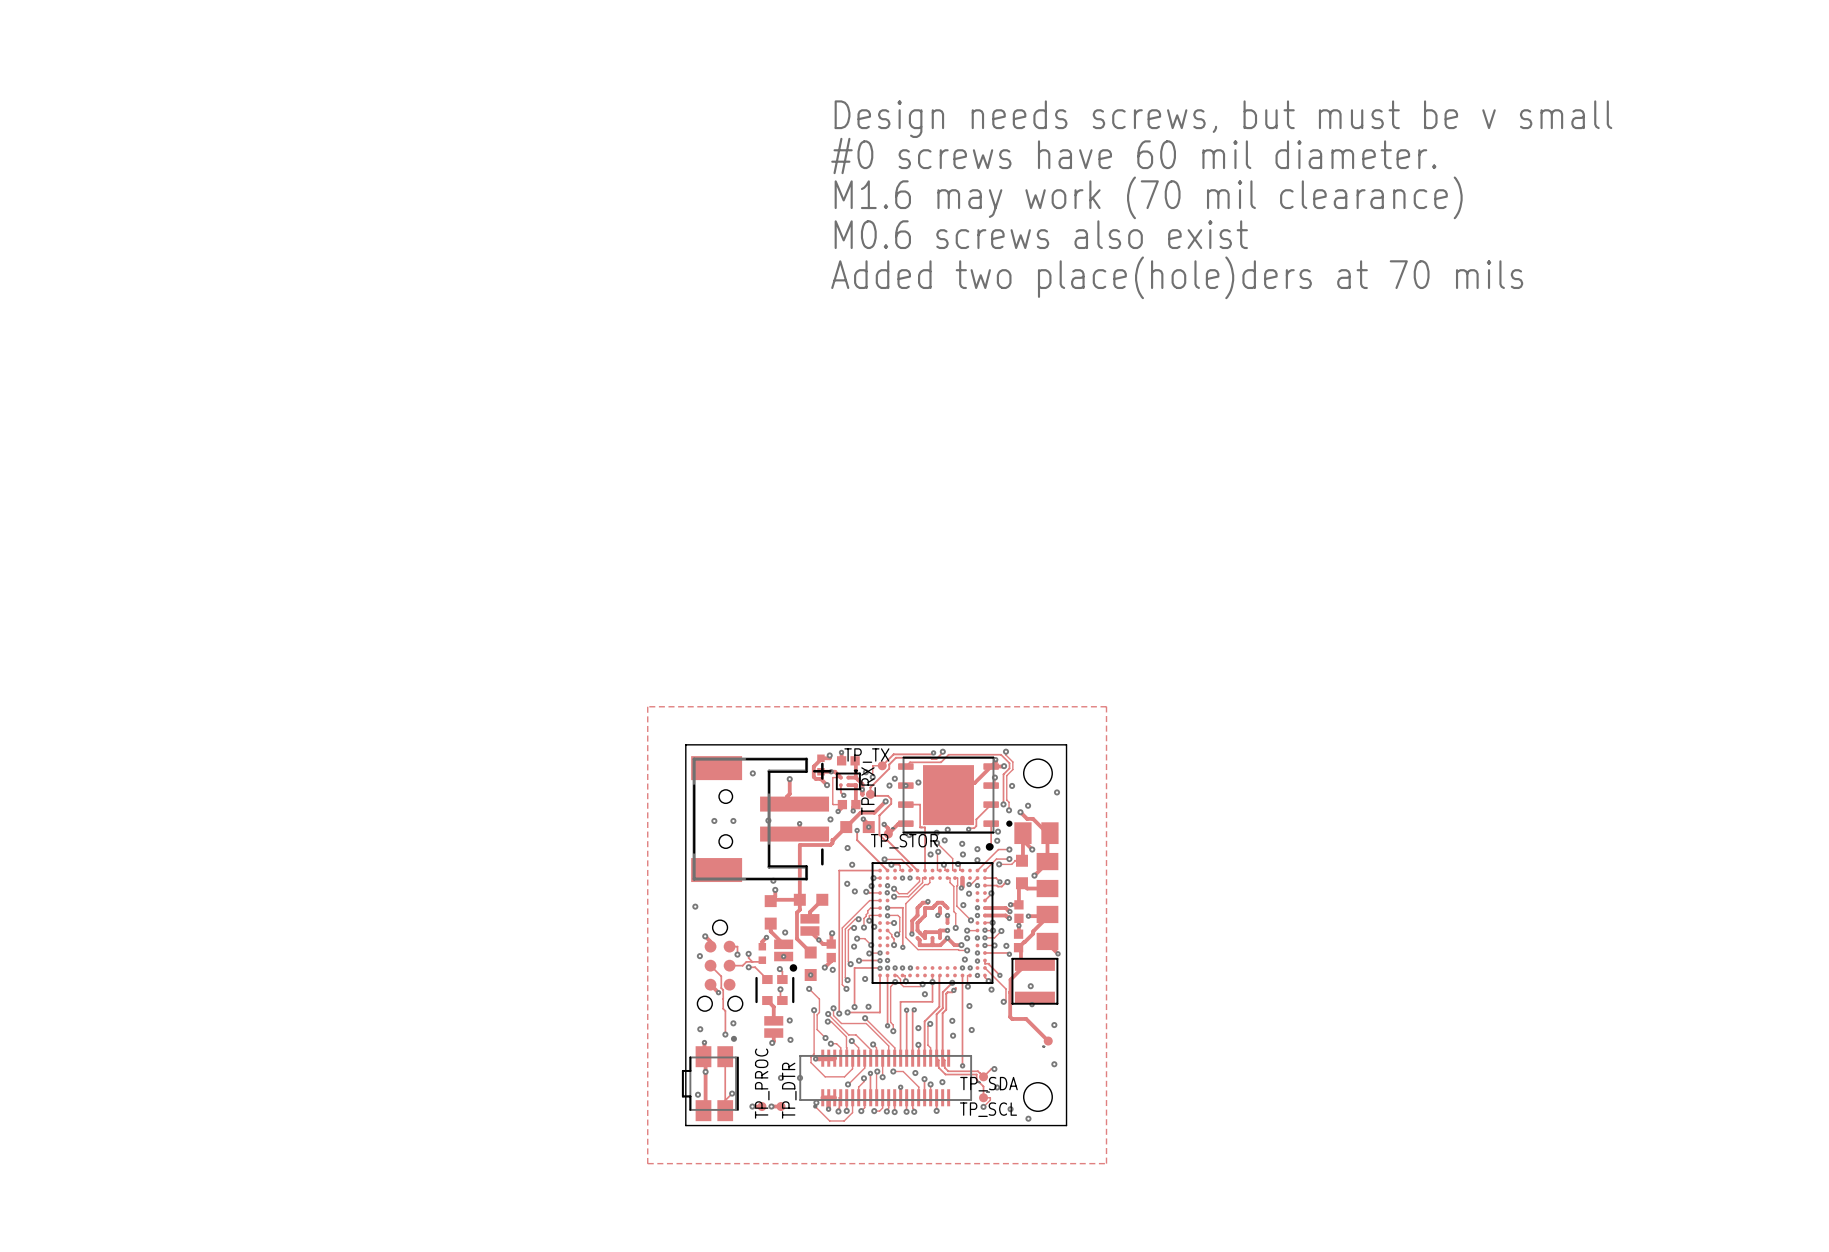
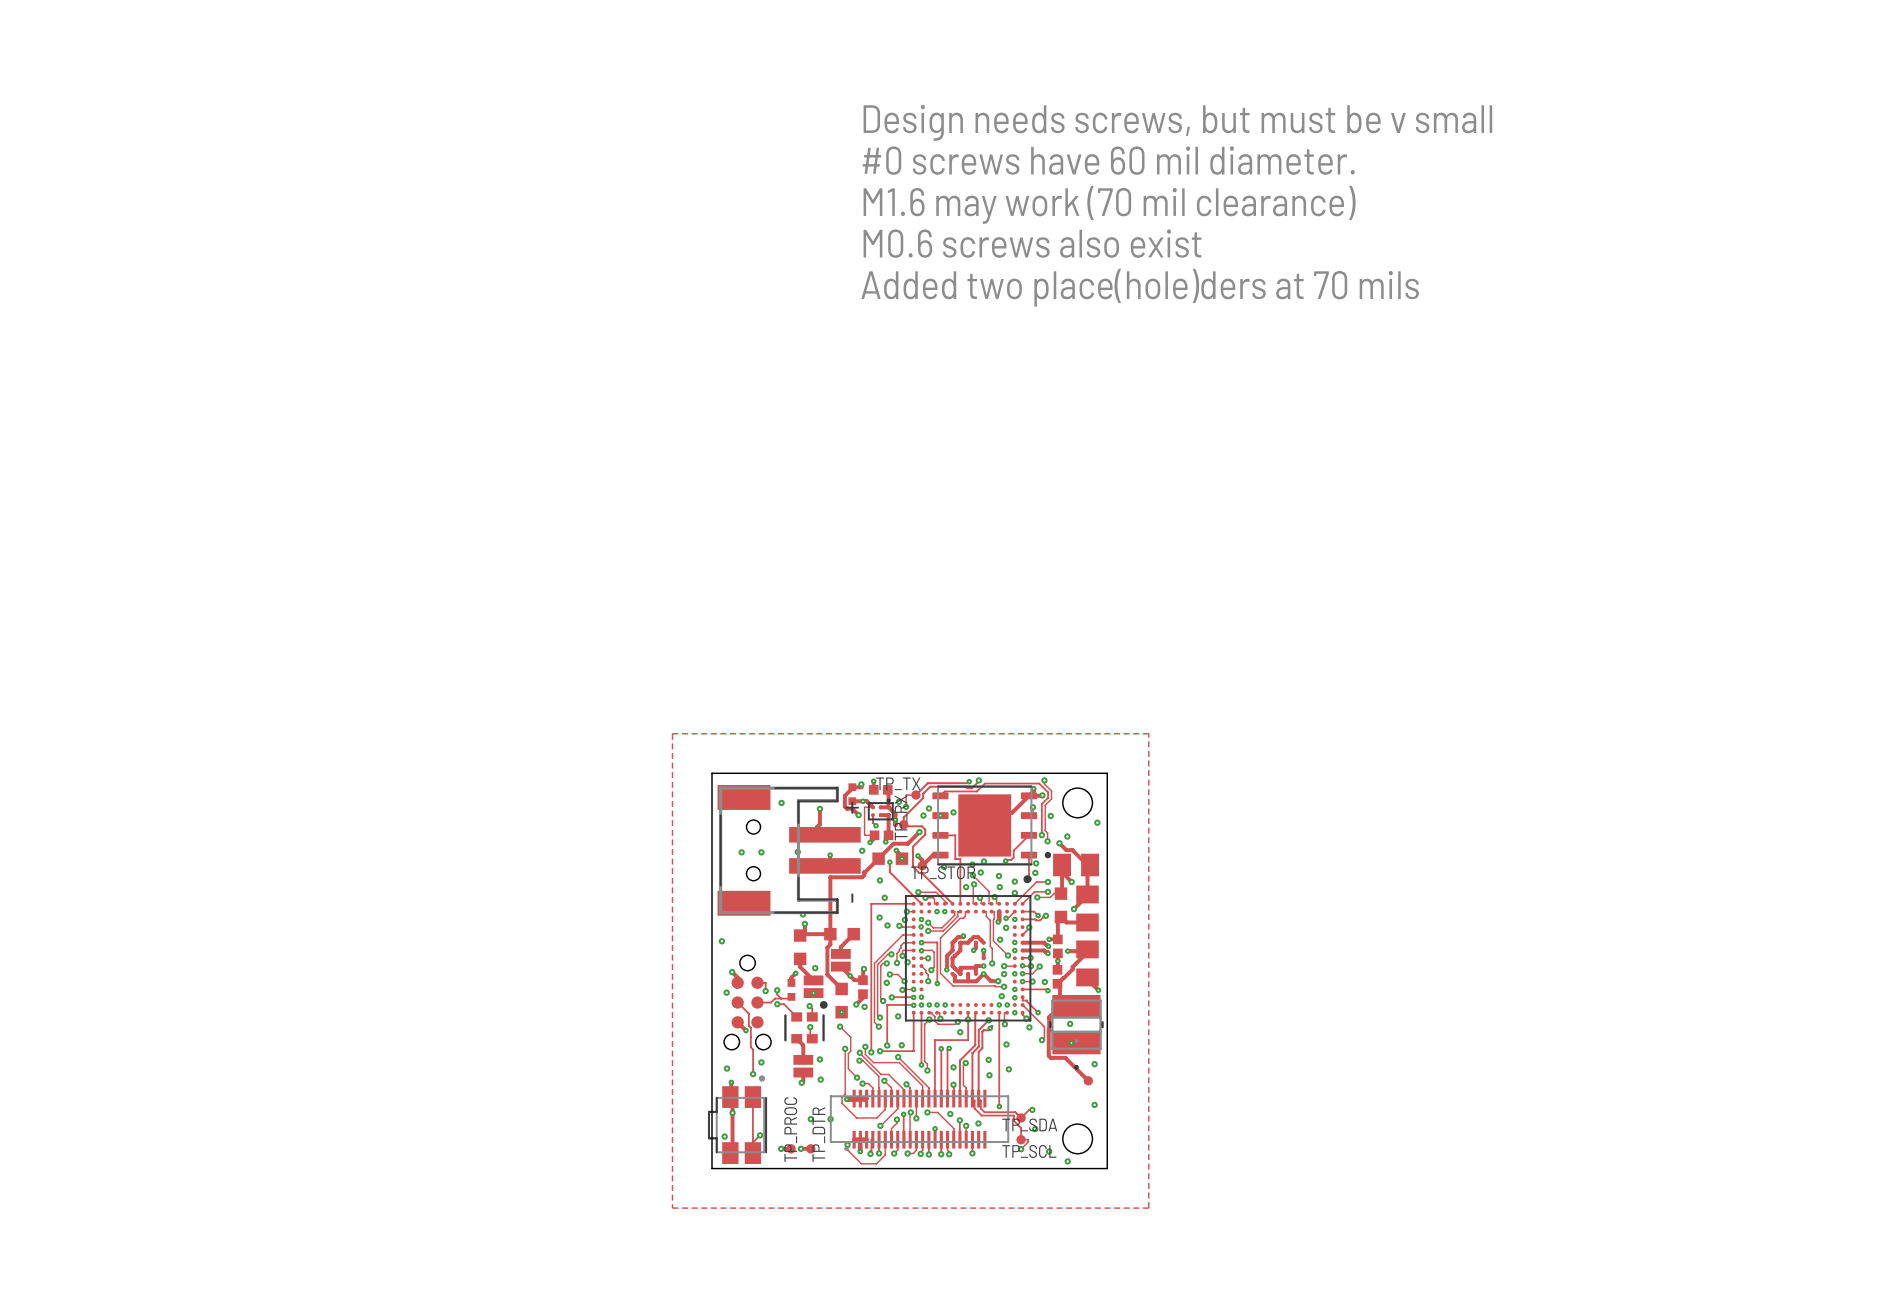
part footprint: [1011, 957, 1059, 1005] -> [1049, 995, 1104, 1070]

